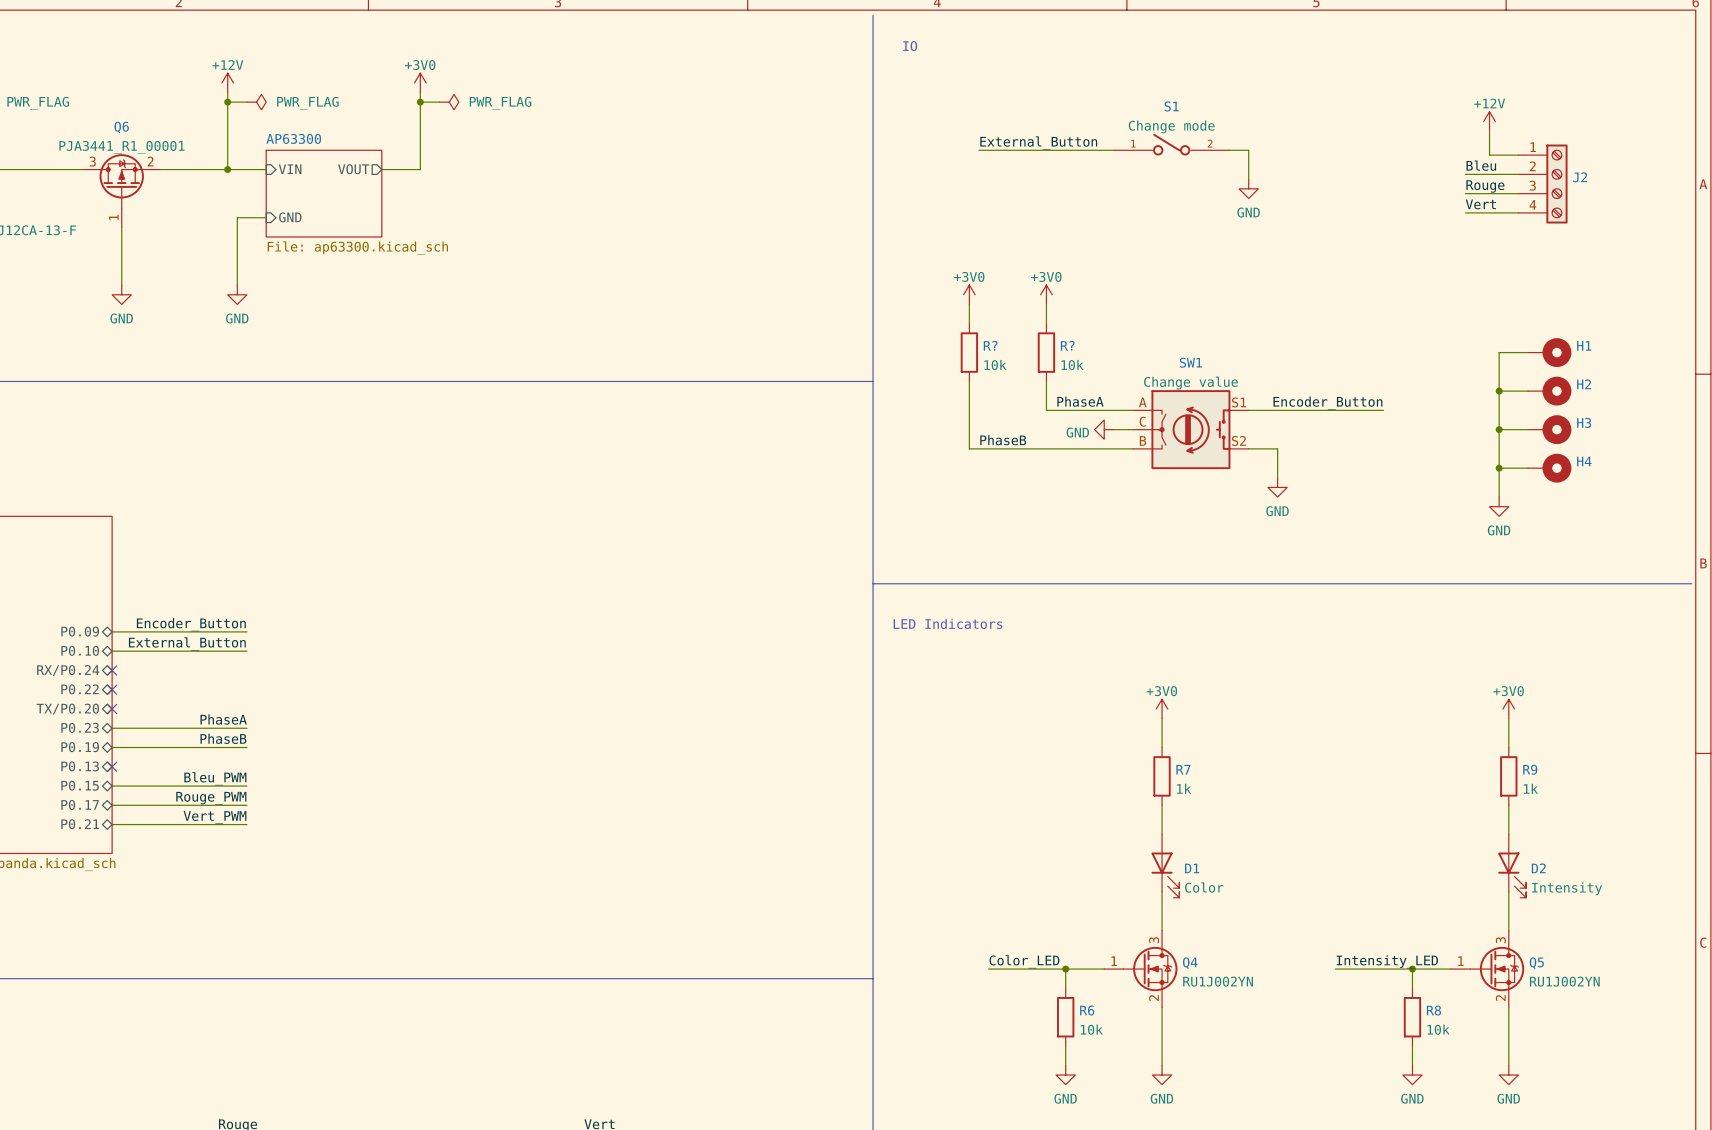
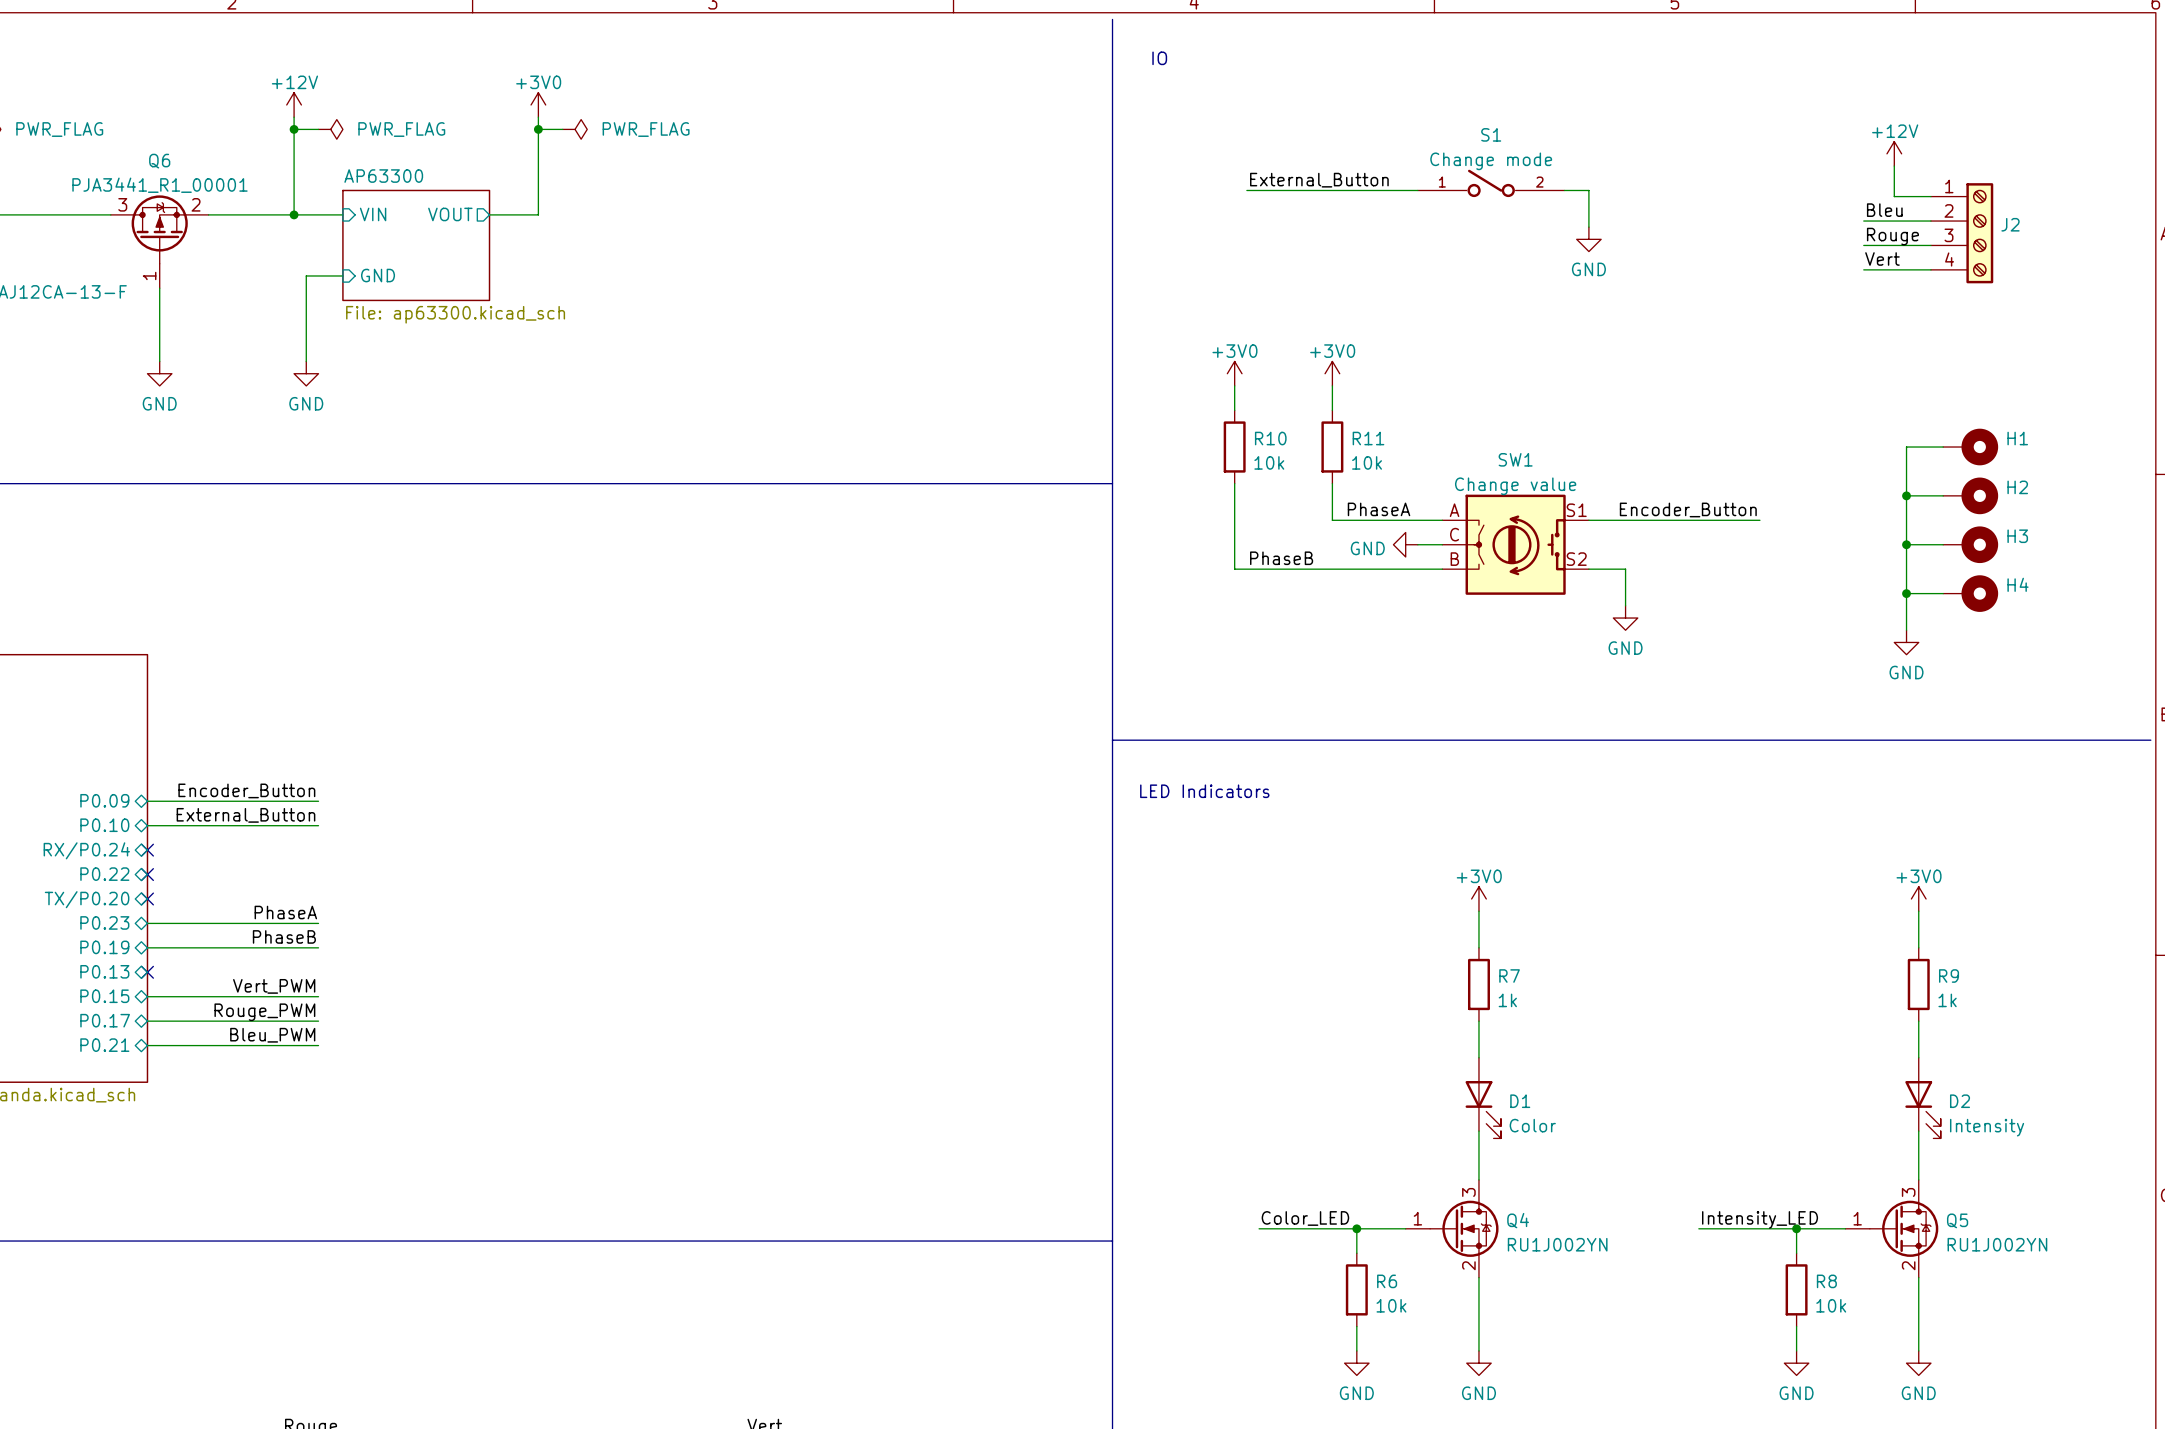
R? name: R? (990, 345) -> R10 (1270, 438)
R? name: R? (1067, 345) -> R11 (1368, 438)
label: Bleu_PWM (215, 778) -> Vert_PWM (274, 986)
label: Vert_PWM (215, 817) -> Bleu_PWM (272, 1035)

